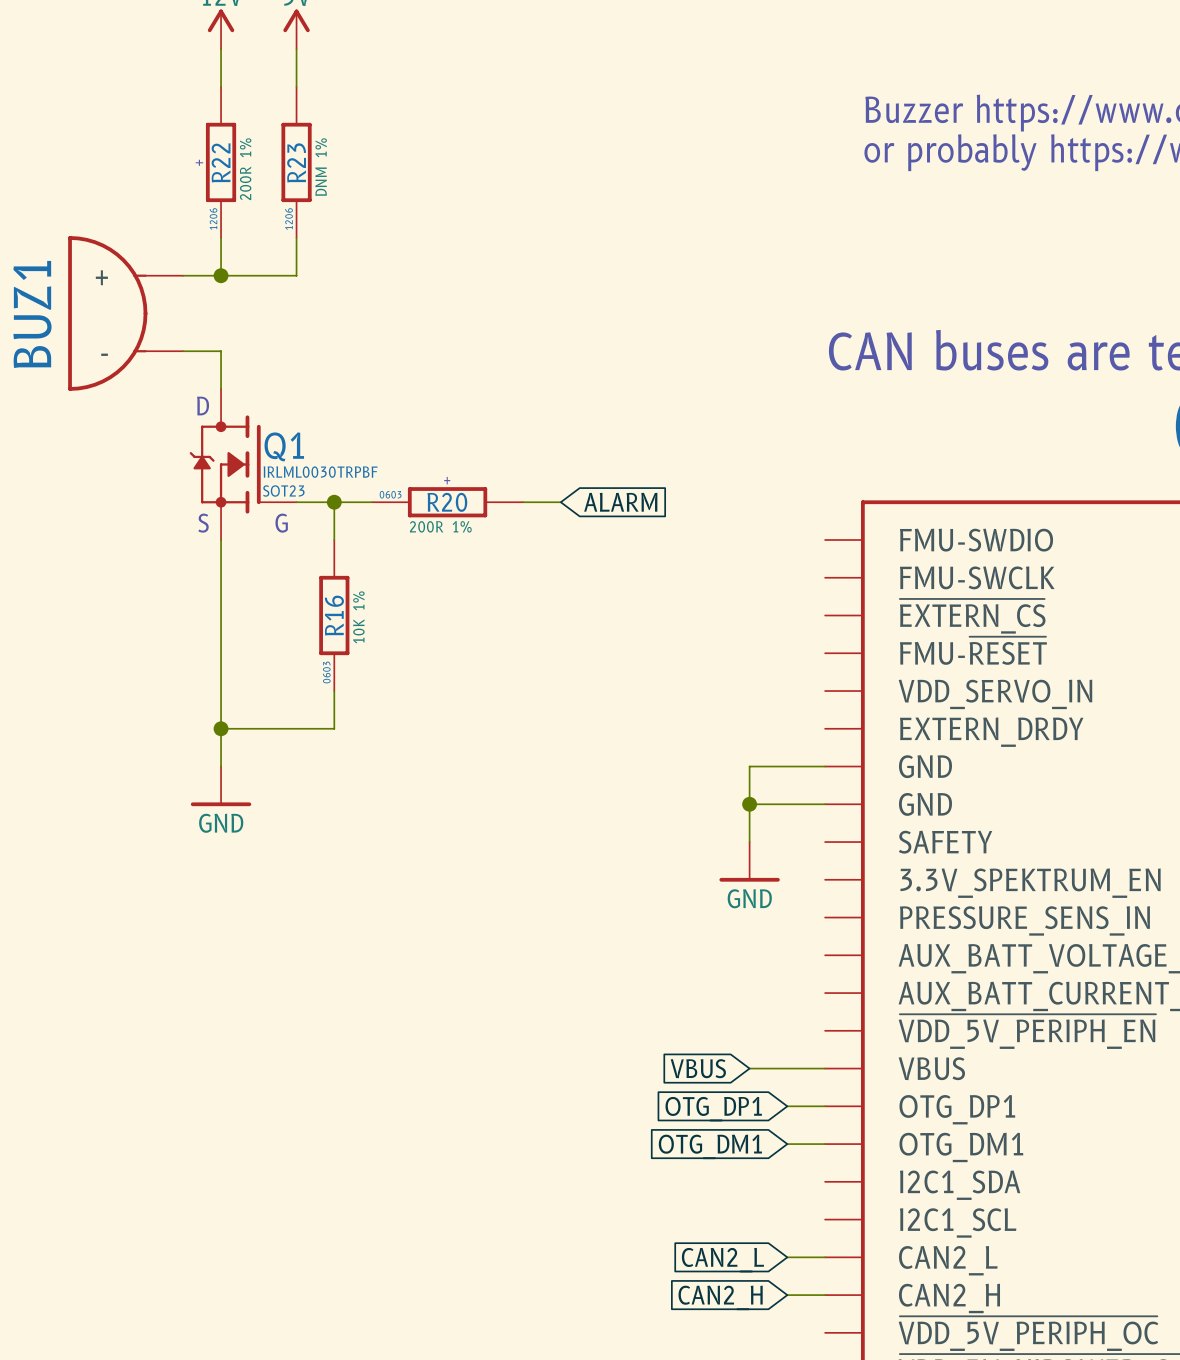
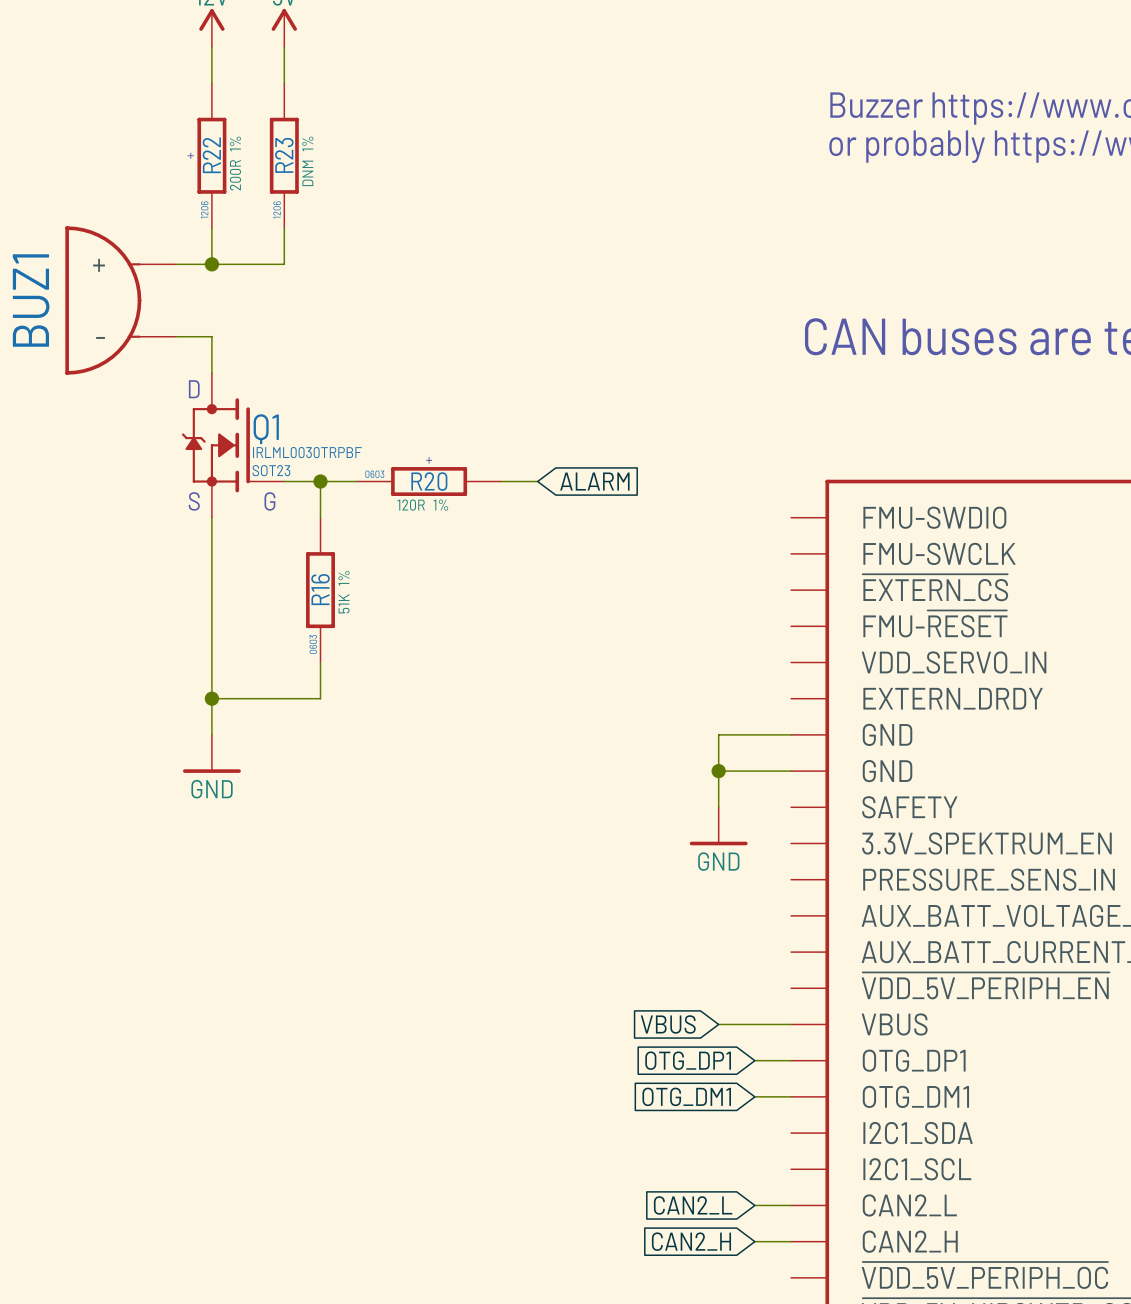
R20 value: 200R (426, 526) -> 120R (411, 505)
R16 value: 10K (358, 631) -> 51K (344, 603)

